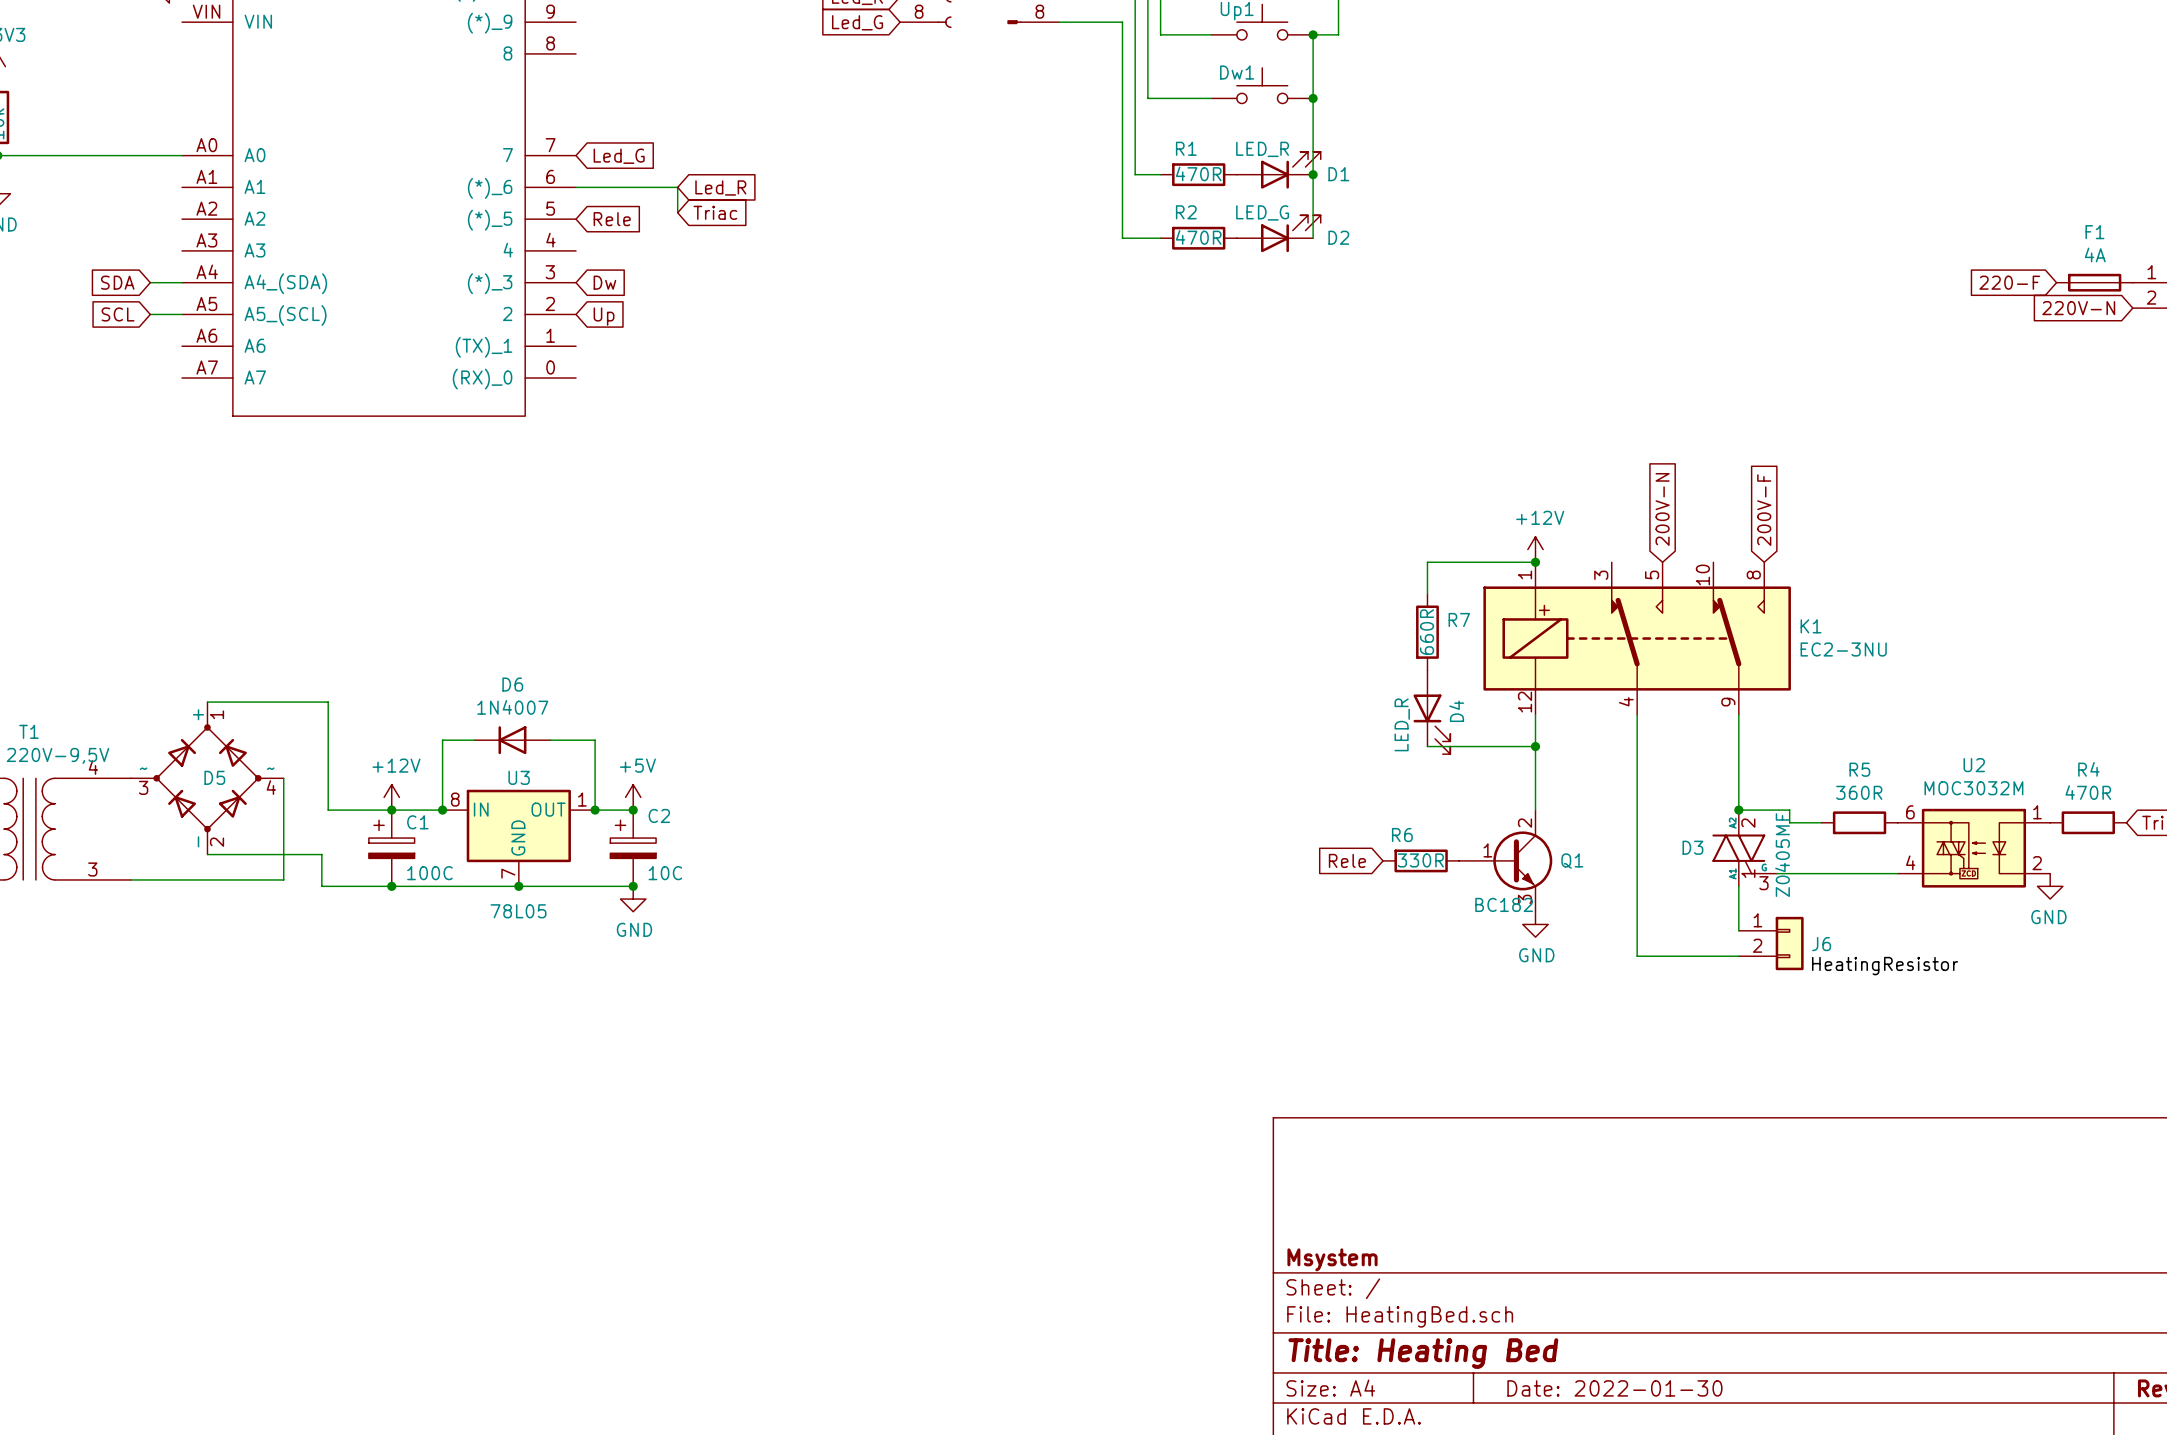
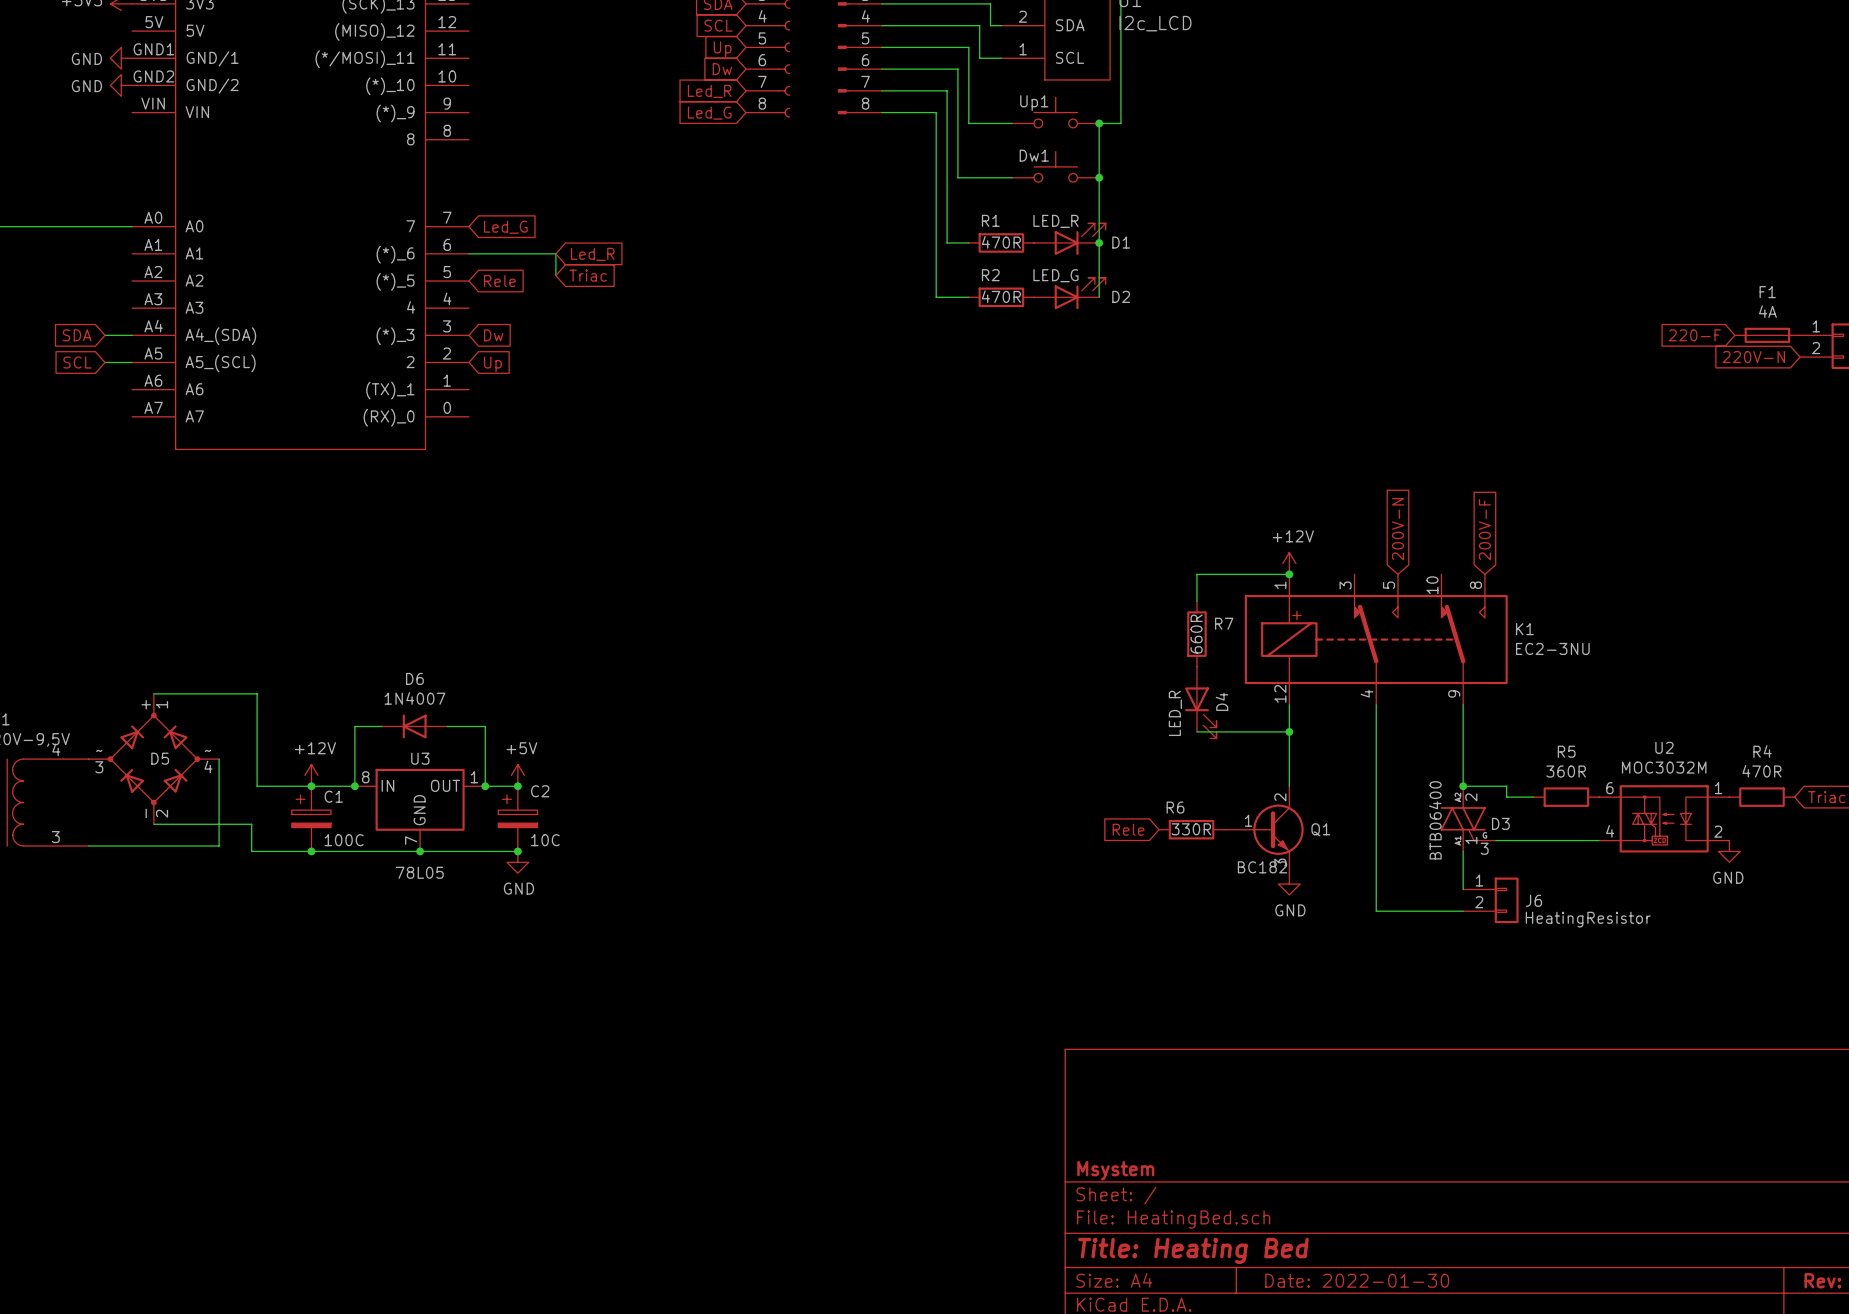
D3 name position: D3 (1692, 847) -> D3 (1500, 823)
D3 value: Z0405MF (1782, 855) -> BTB06400 (1435, 820)

